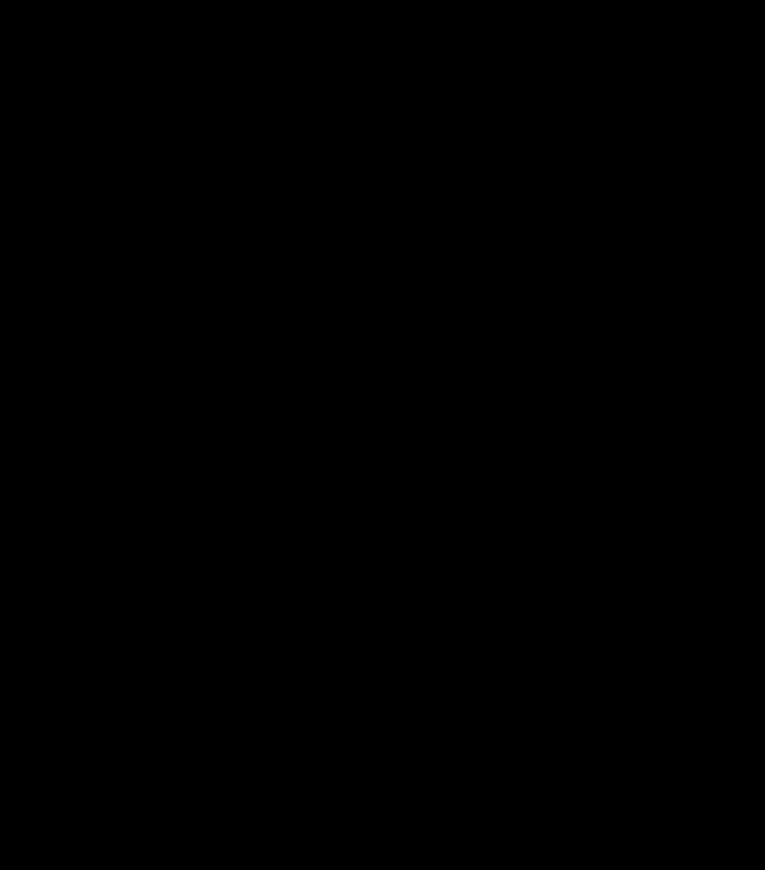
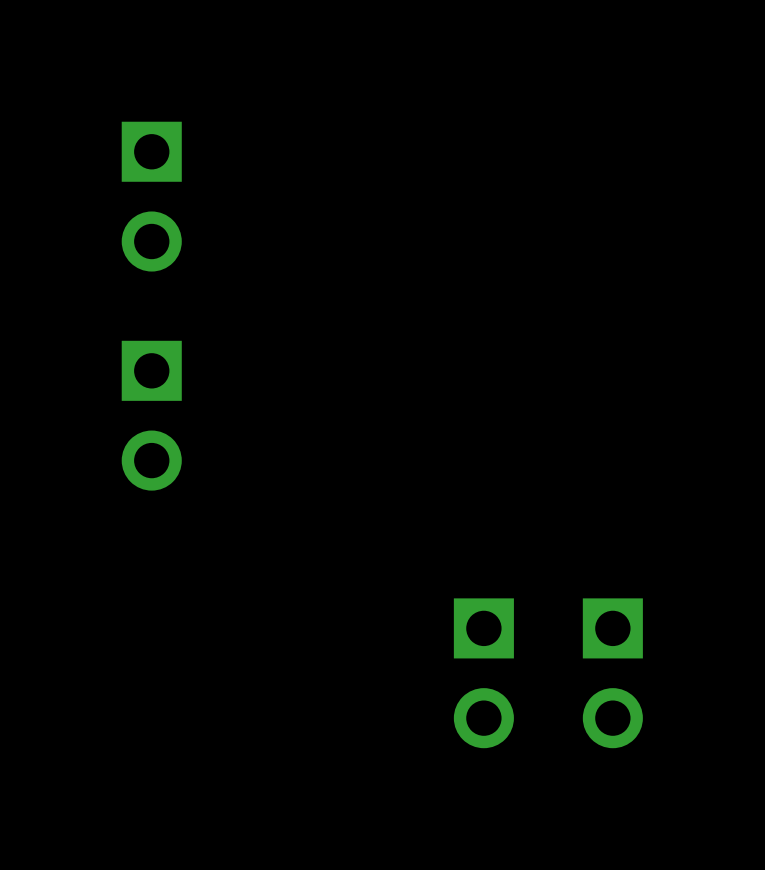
part: none -> (151, 196)
part: none -> (151, 415)
part: none -> (483, 673)
part: none -> (612, 673)

